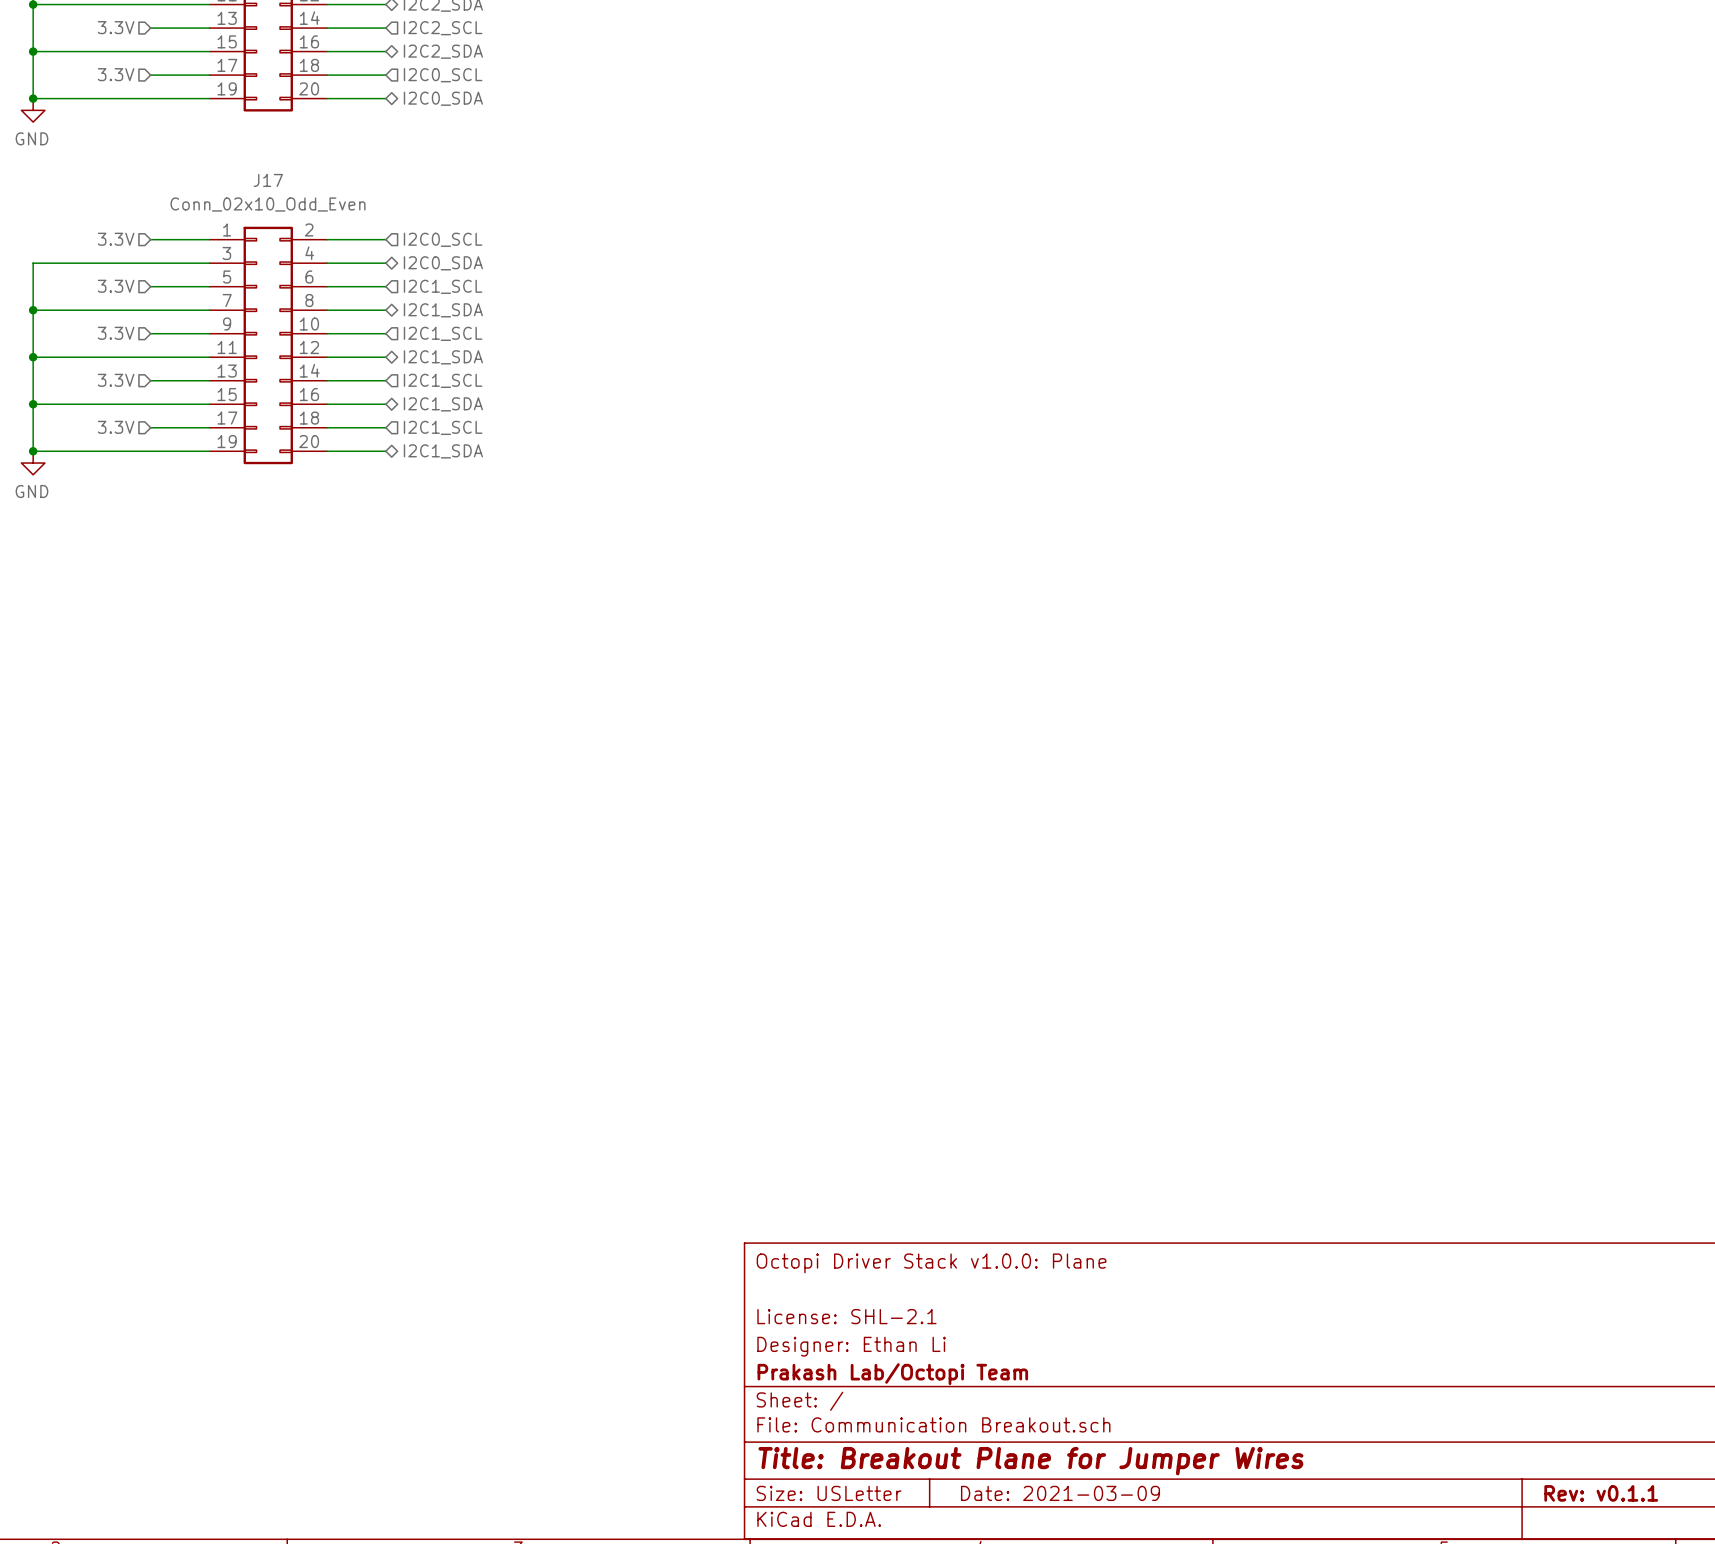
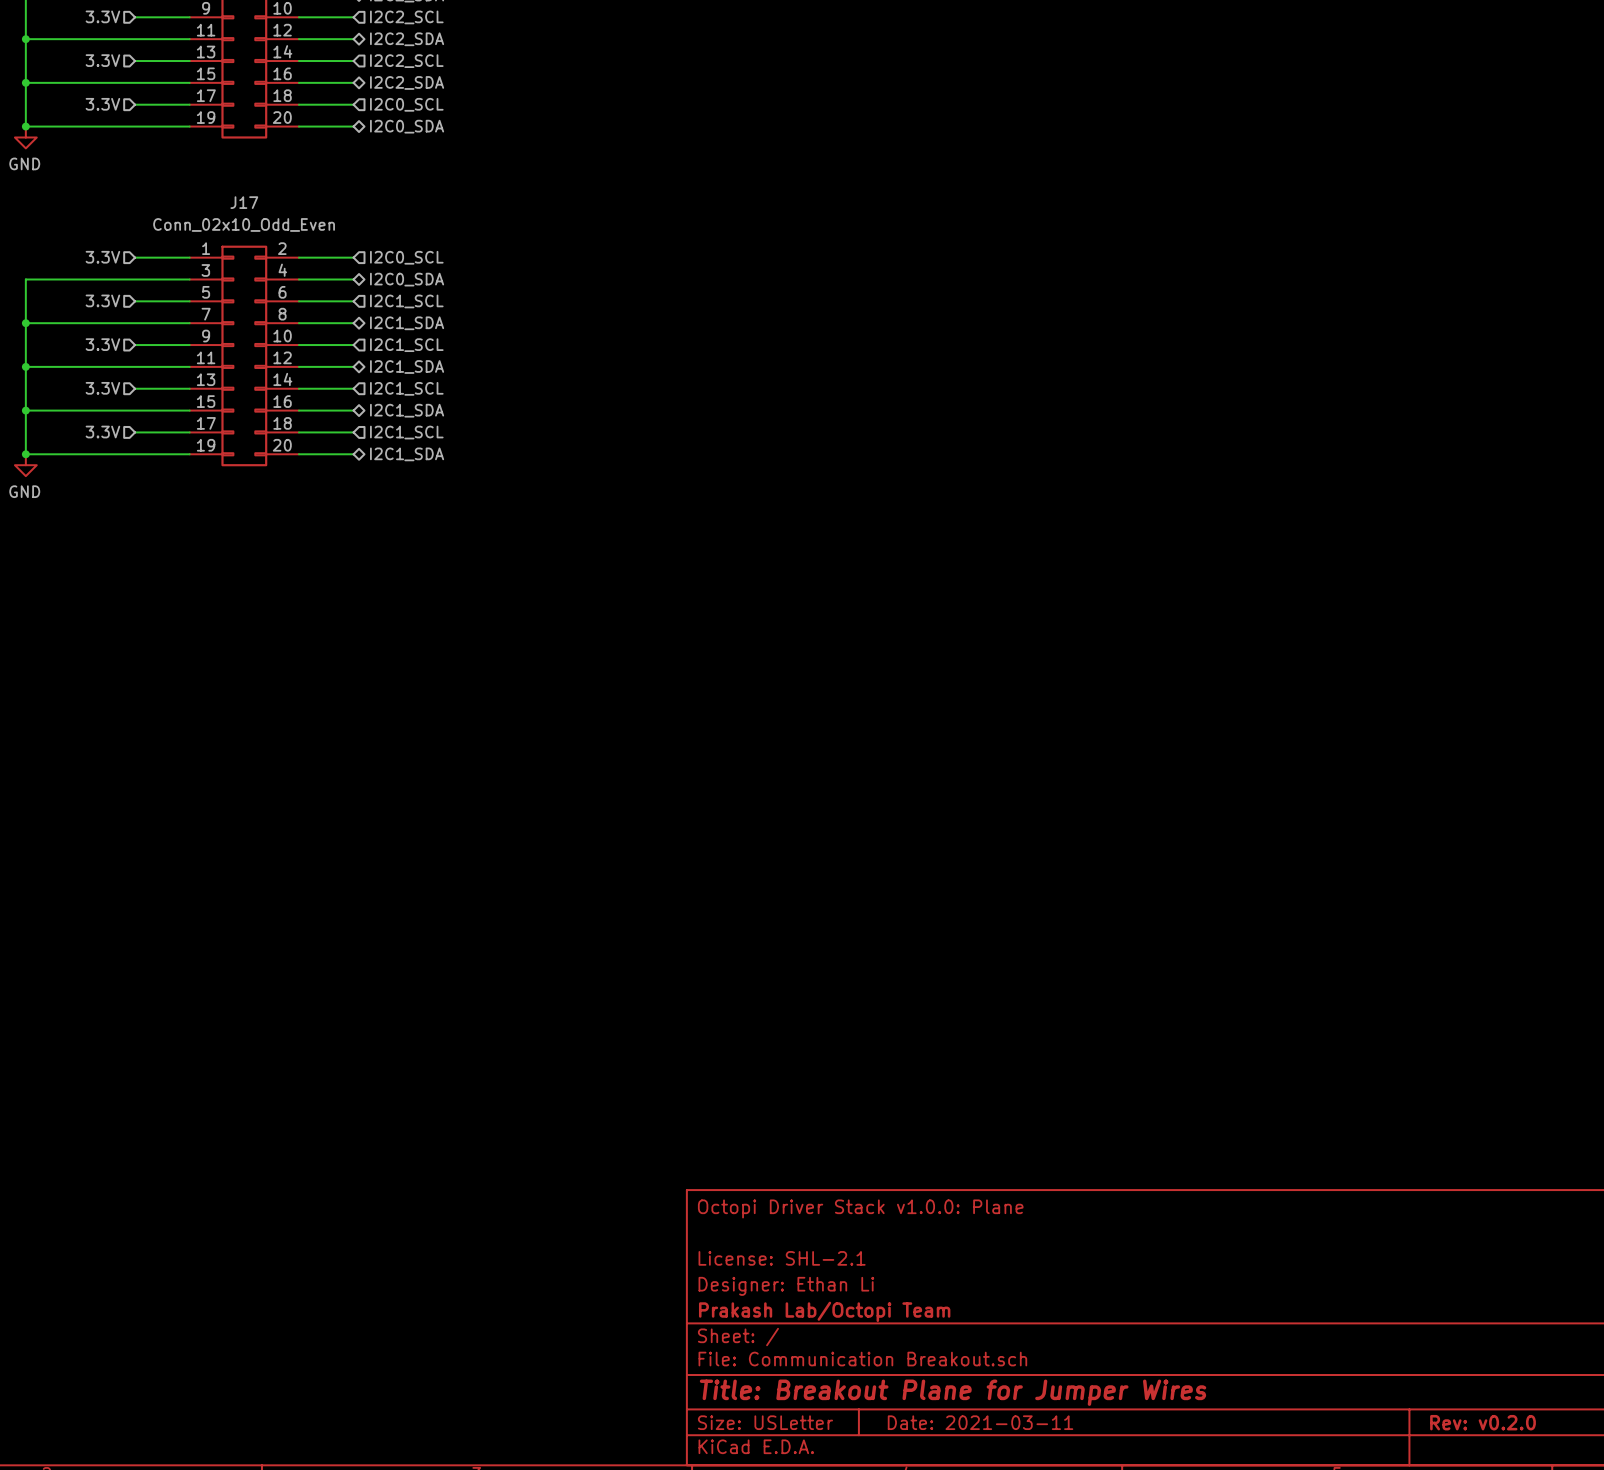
title block: Date: 2021-03-09 (1060, 1493) -> Date: 2021-03-11 (980, 1422)
title block: Rev: v0.1.1 (1601, 1493) -> Rev: v0.2.0 (1483, 1422)

